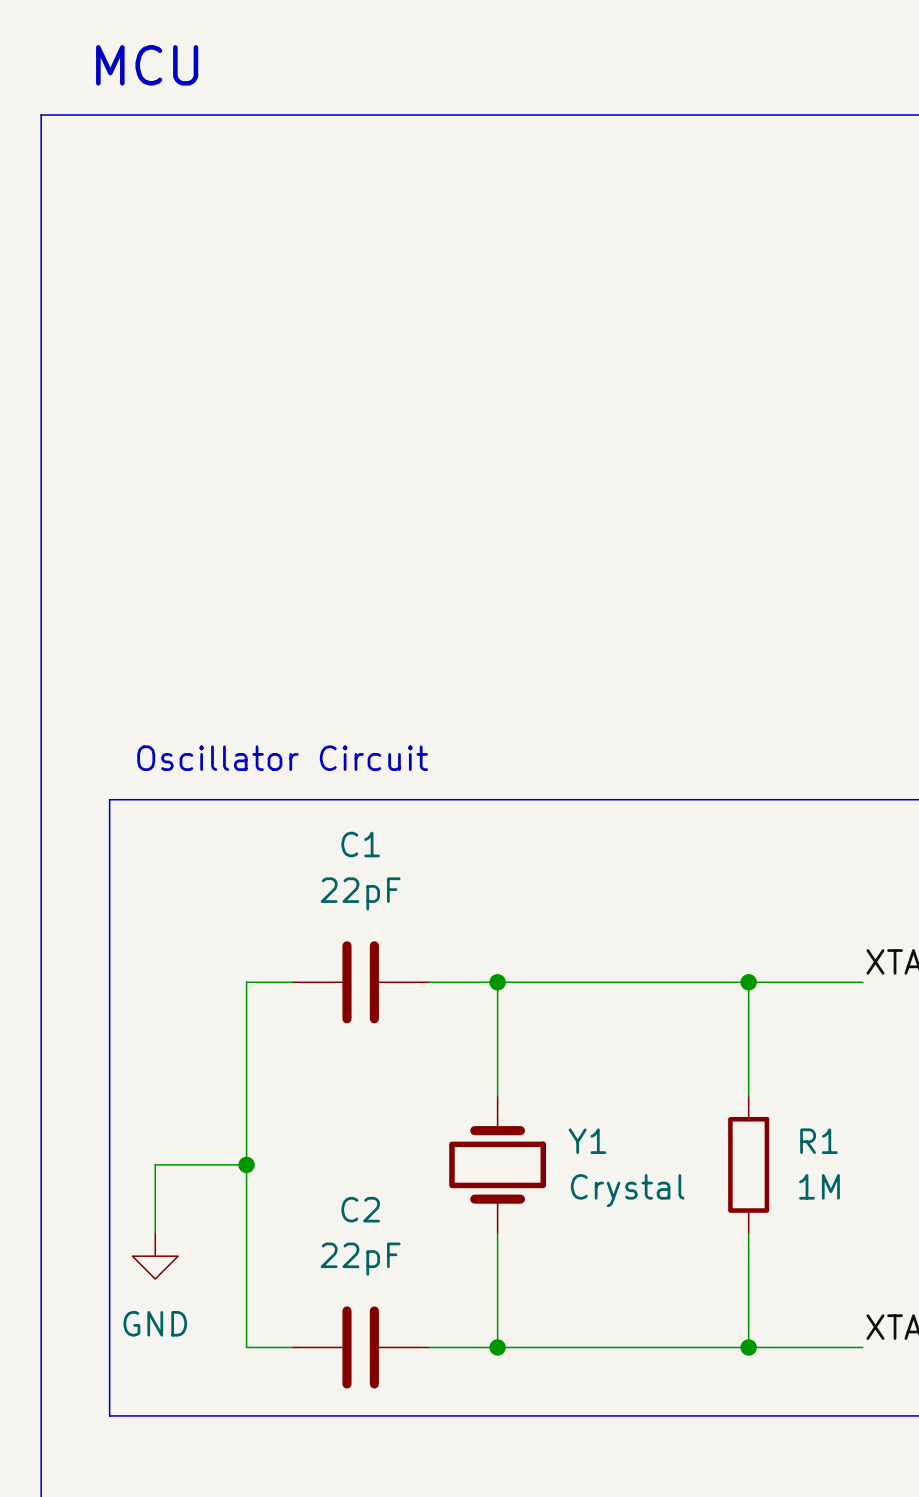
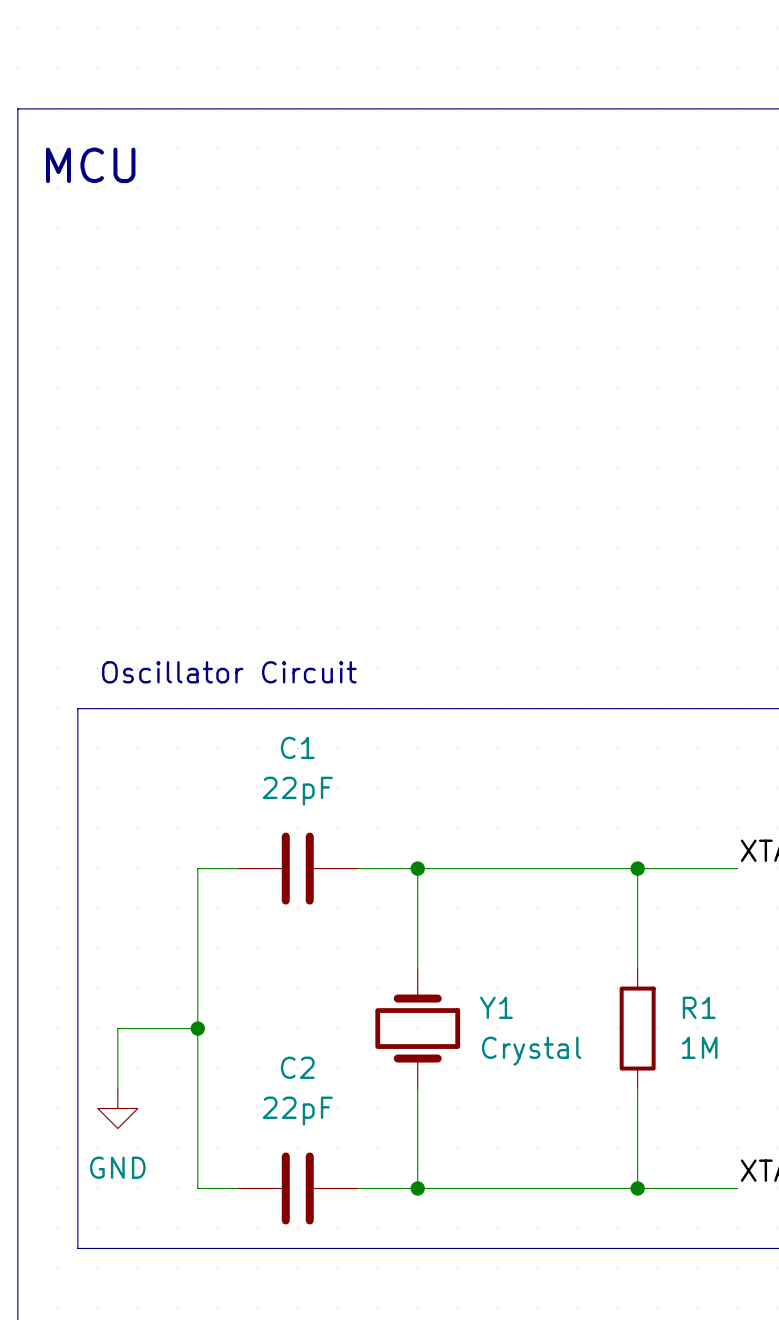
text position: MCU (147, 65) -> MCU (90, 165)

